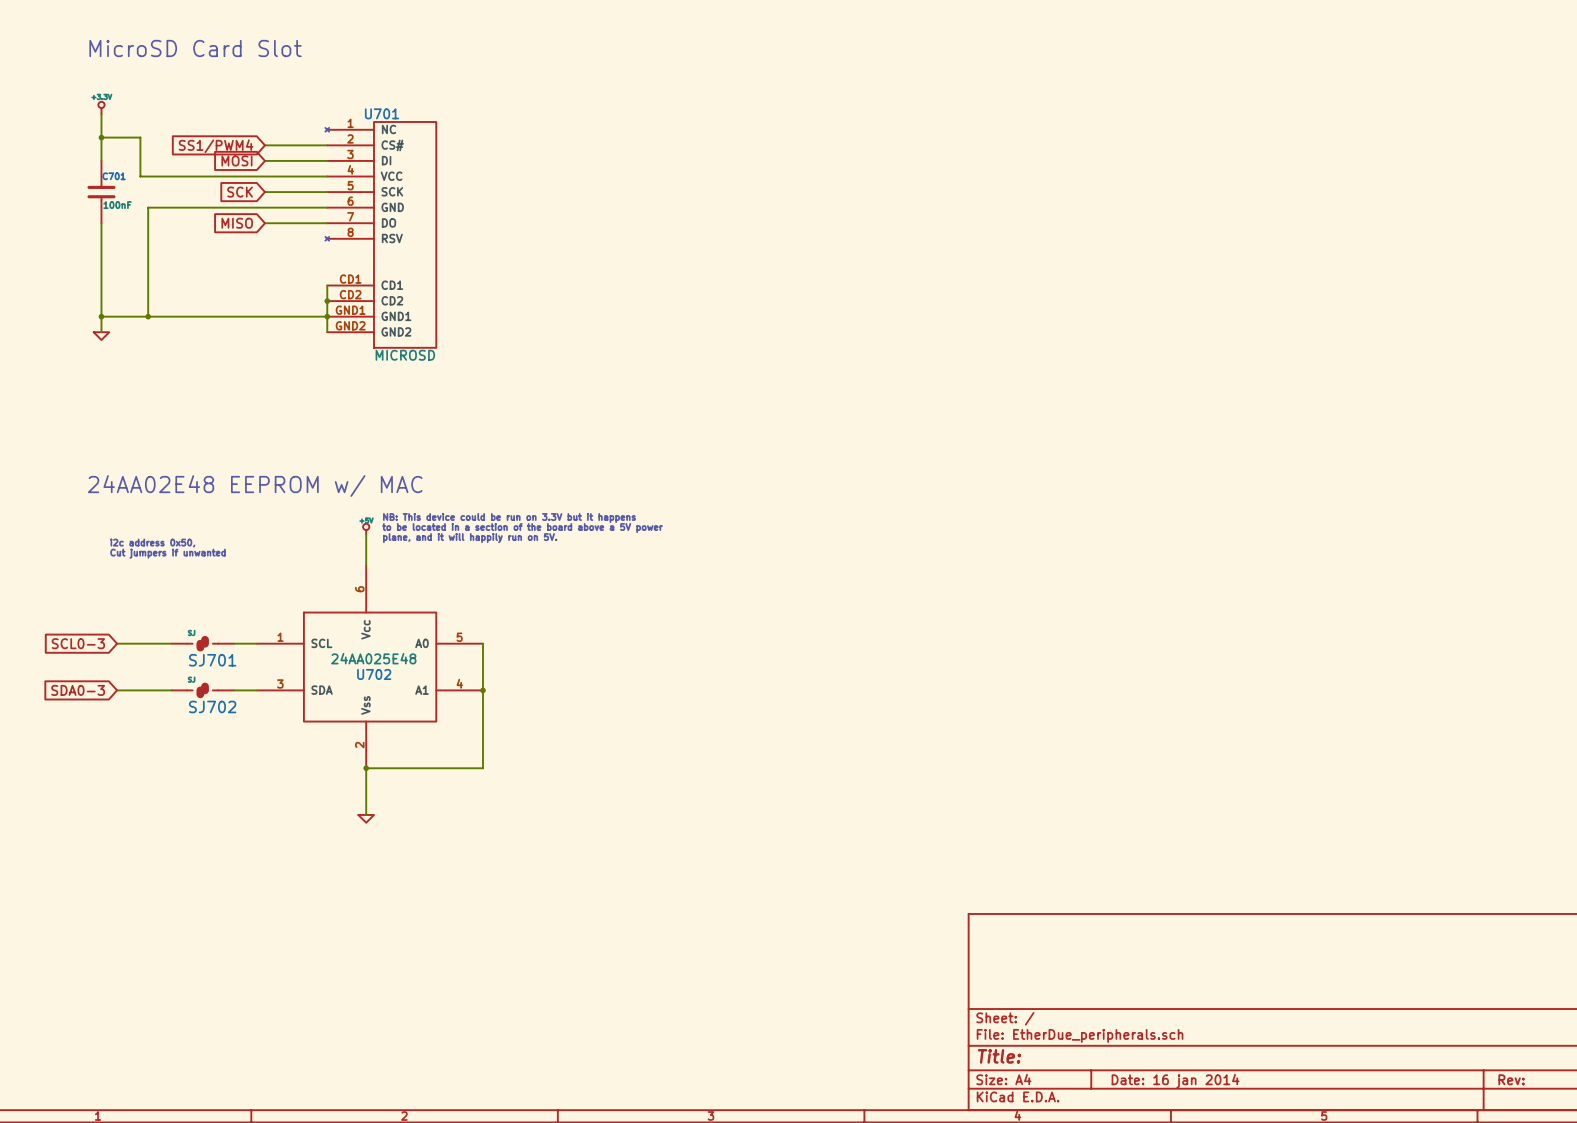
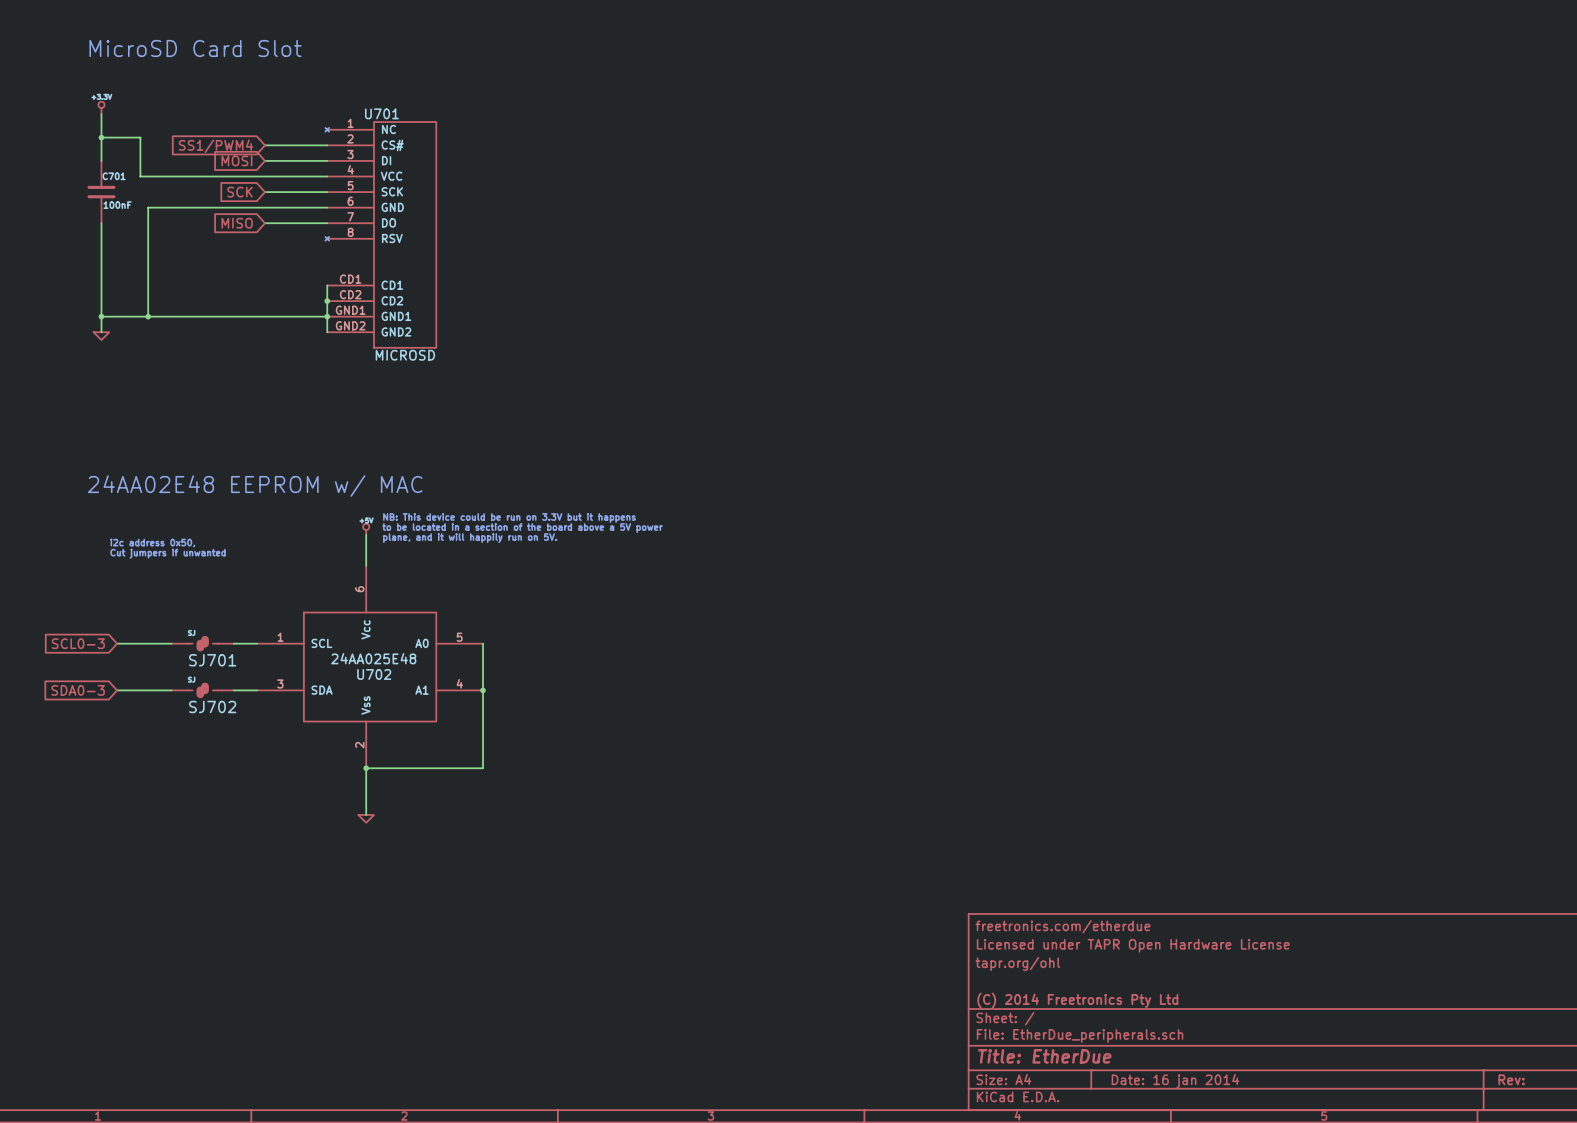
title block: none -> freetronics.com/etherdue (1062, 926)
title block: none -> Licensed under TAPR Open Hardware License (1133, 945)
title block: none -> tapr.org/ohl (1017, 963)
title block: none -> (C) 2014 Freetronics Pty Ltd (1077, 1000)
title block: Title: (999, 1056) -> Title: EtherDue (1044, 1056)

